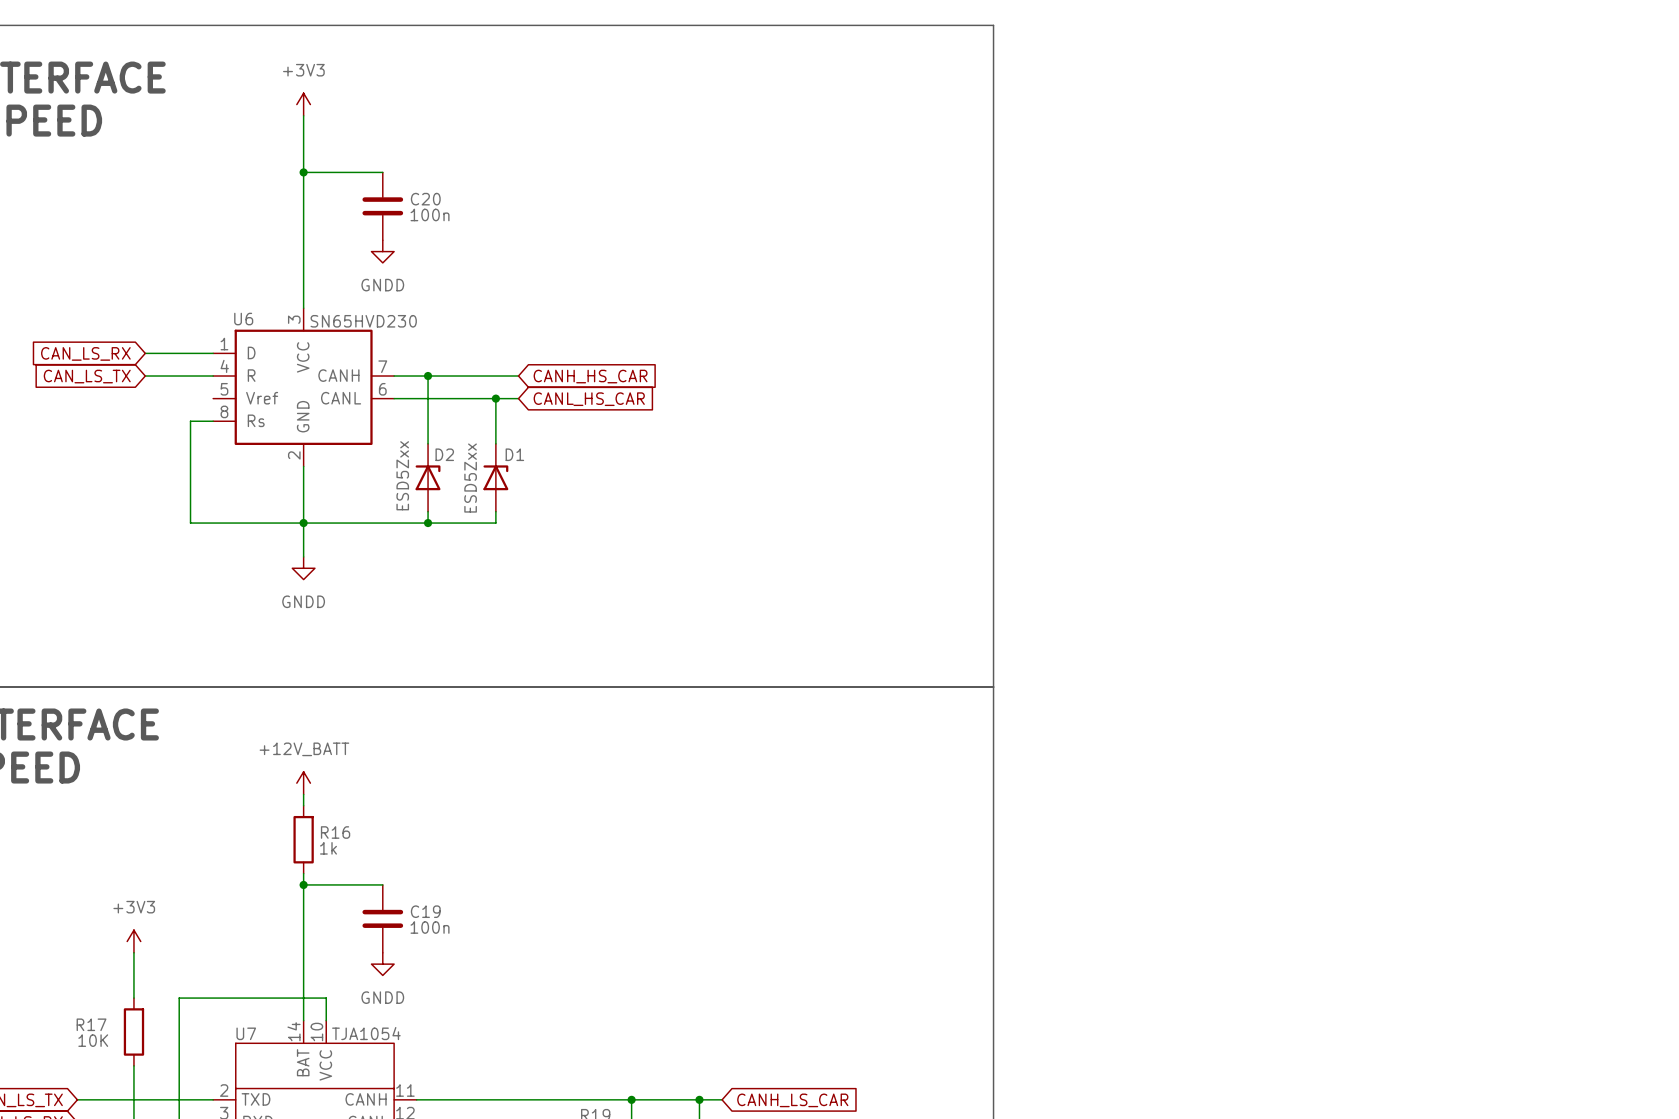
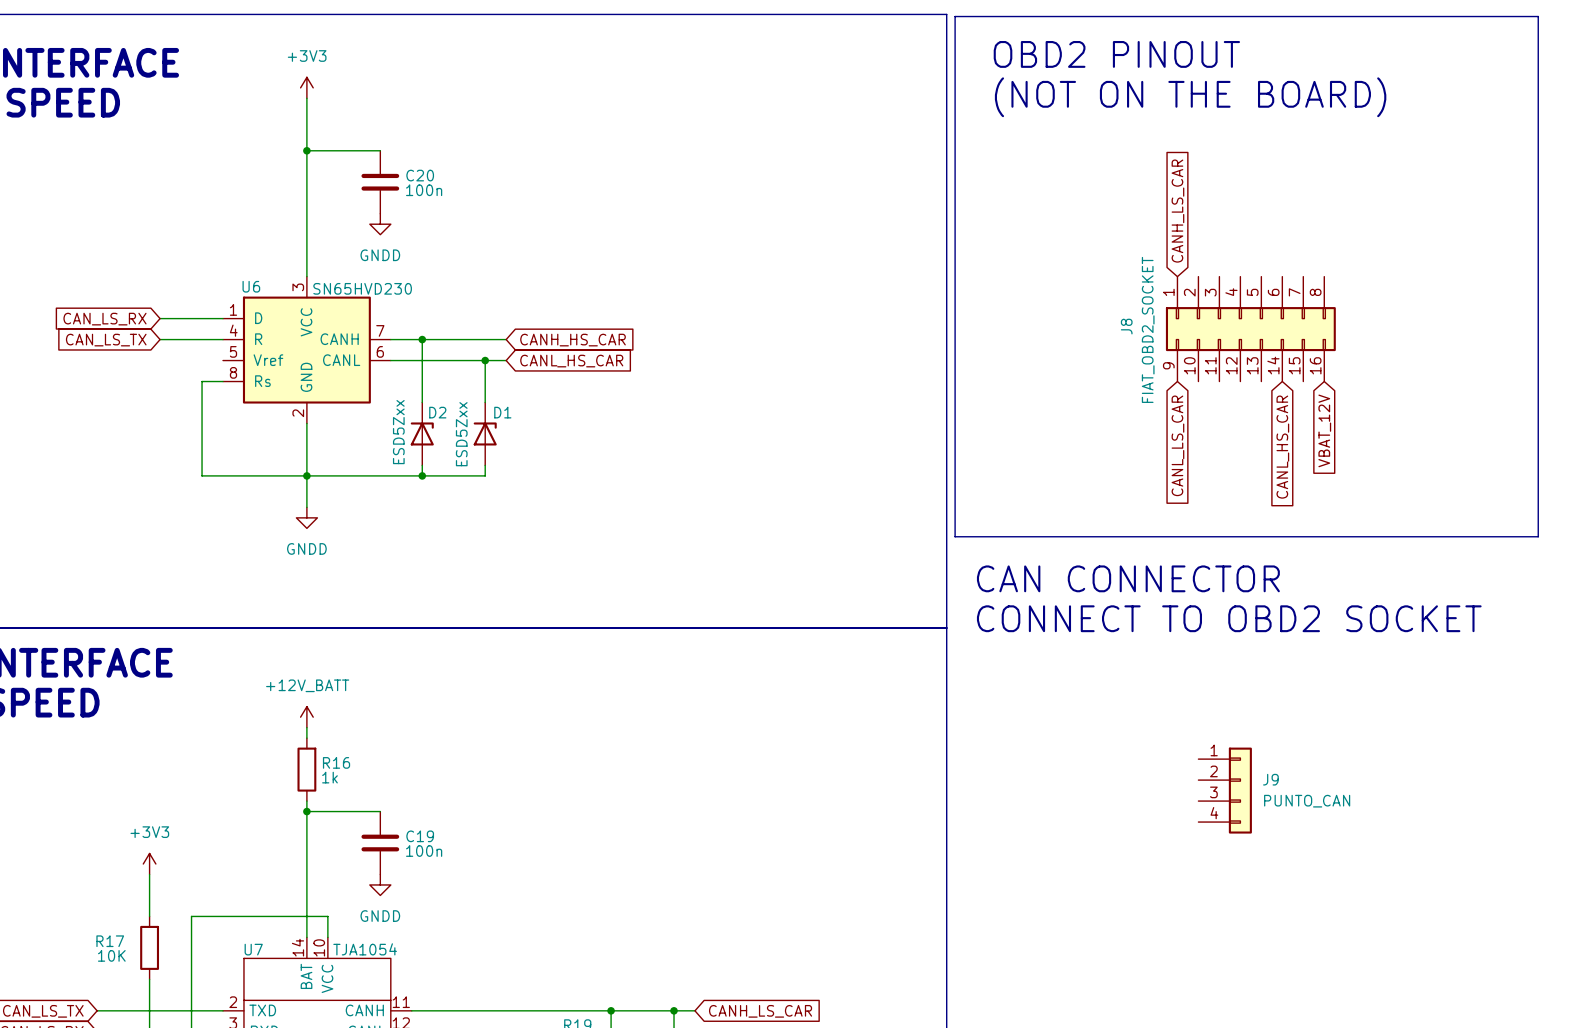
line: none -> (955, 16) (1538, 16) (1538, 536) (955, 536) (955, 16)
text: none -> OBD2 PINOUT (1116, 54)
text: none -> (NOT ON THE BOARD) (1190, 97)
global label: none -> CANH_LS_CAR (1177, 211)
J8: none -> FIAT_OBD2_SOCKET (1250, 329)
global label: none -> VBAT_12V (1324, 430)
global label: none -> CANL_LS_CAR (1177, 445)
global label: none -> CANL_HS_CAR (1282, 447)
text: none -> CAN CONNECTOR (1128, 578)
text: none -> CONNECT TO OBD2 SOCKET (1229, 618)
J9: none -> PUNTO_CAN (1225, 790)

